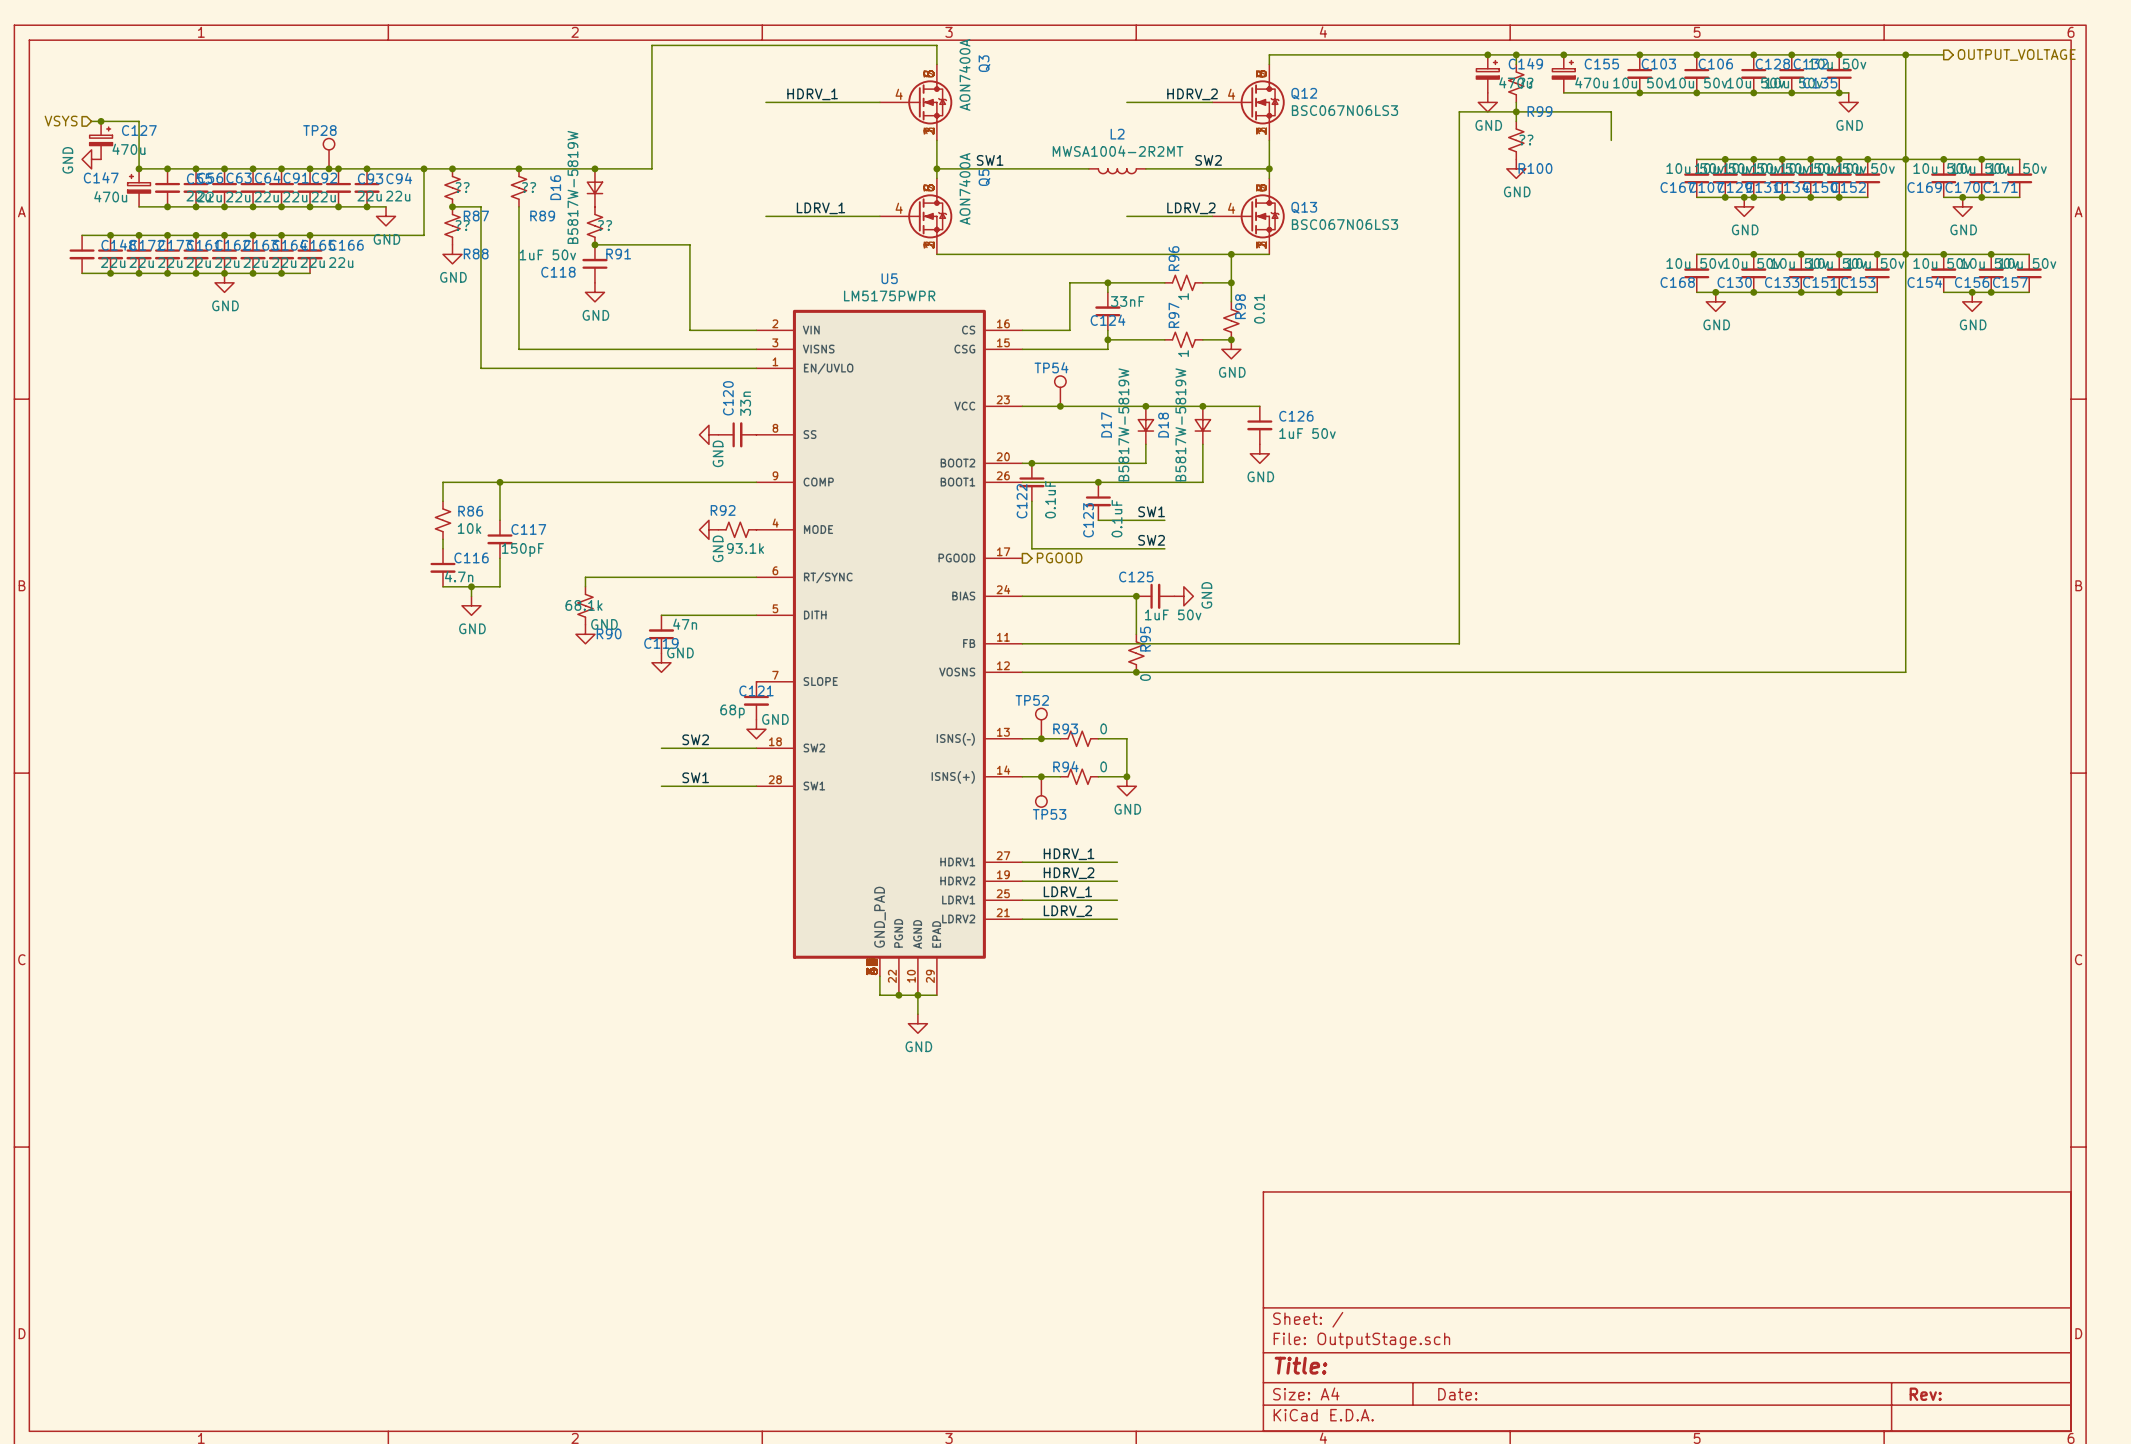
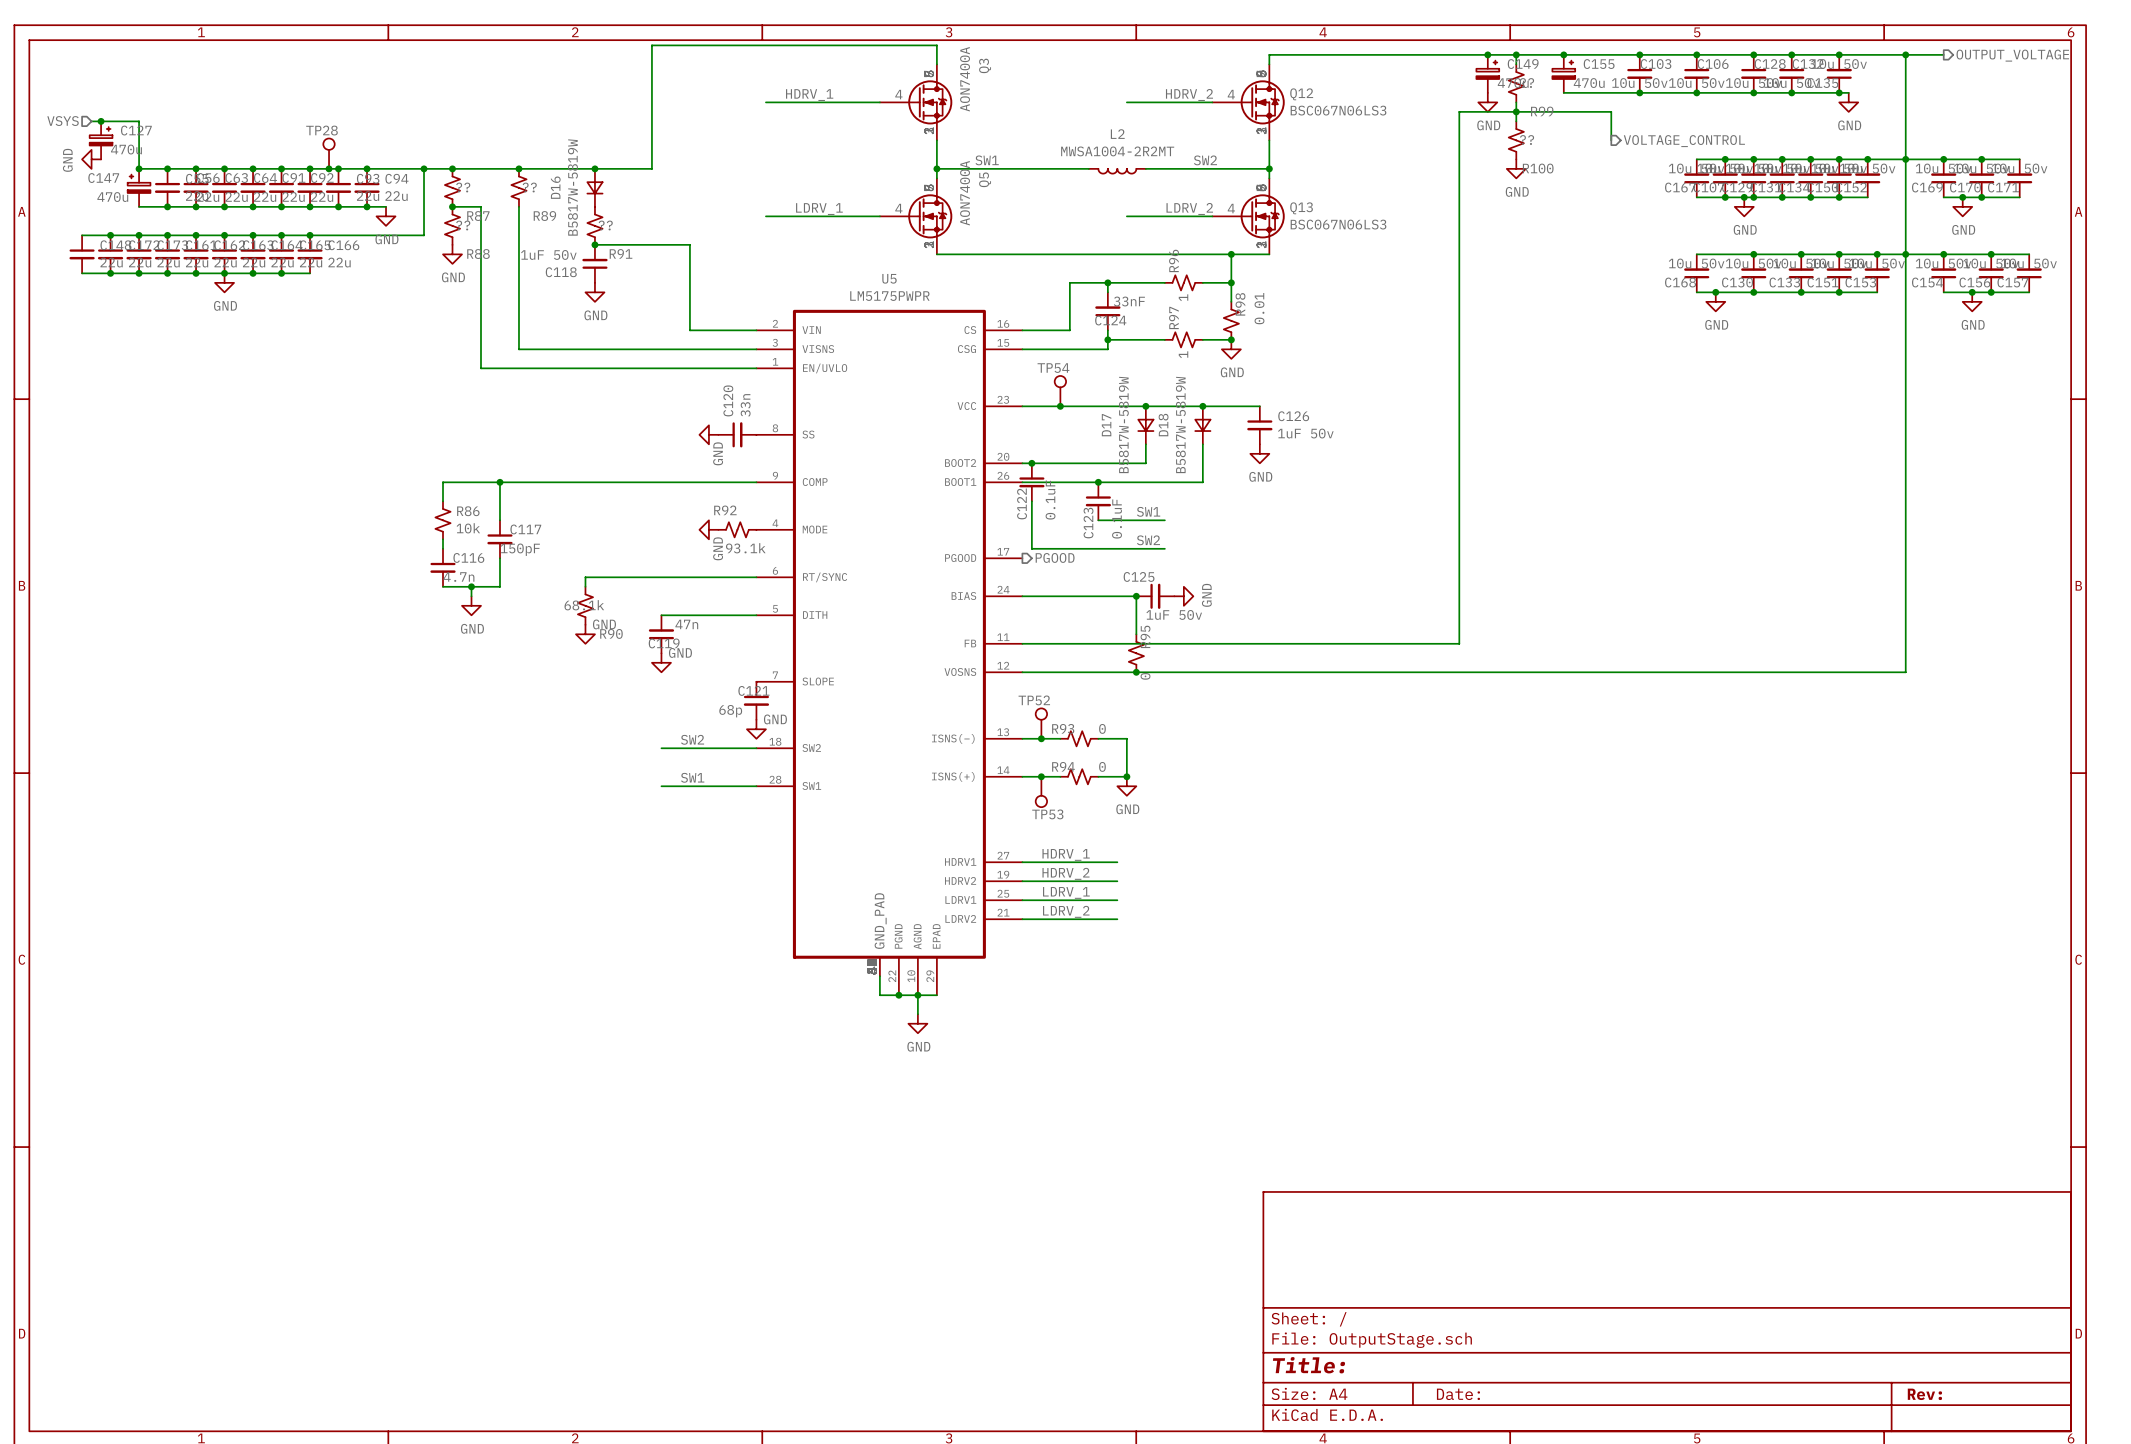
hierarchical label: none -> VOLTAGE_CONTROL (1684, 141)

